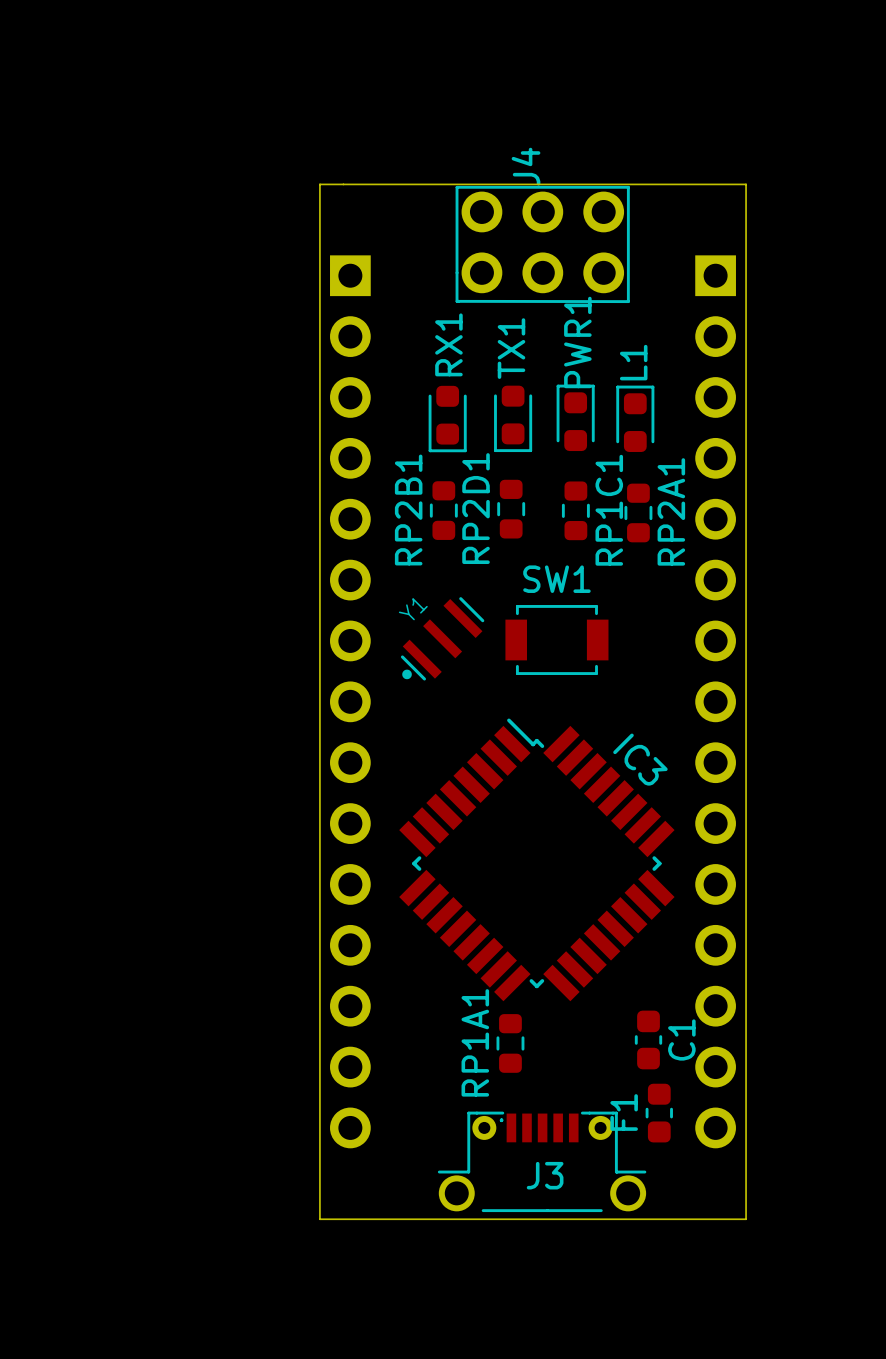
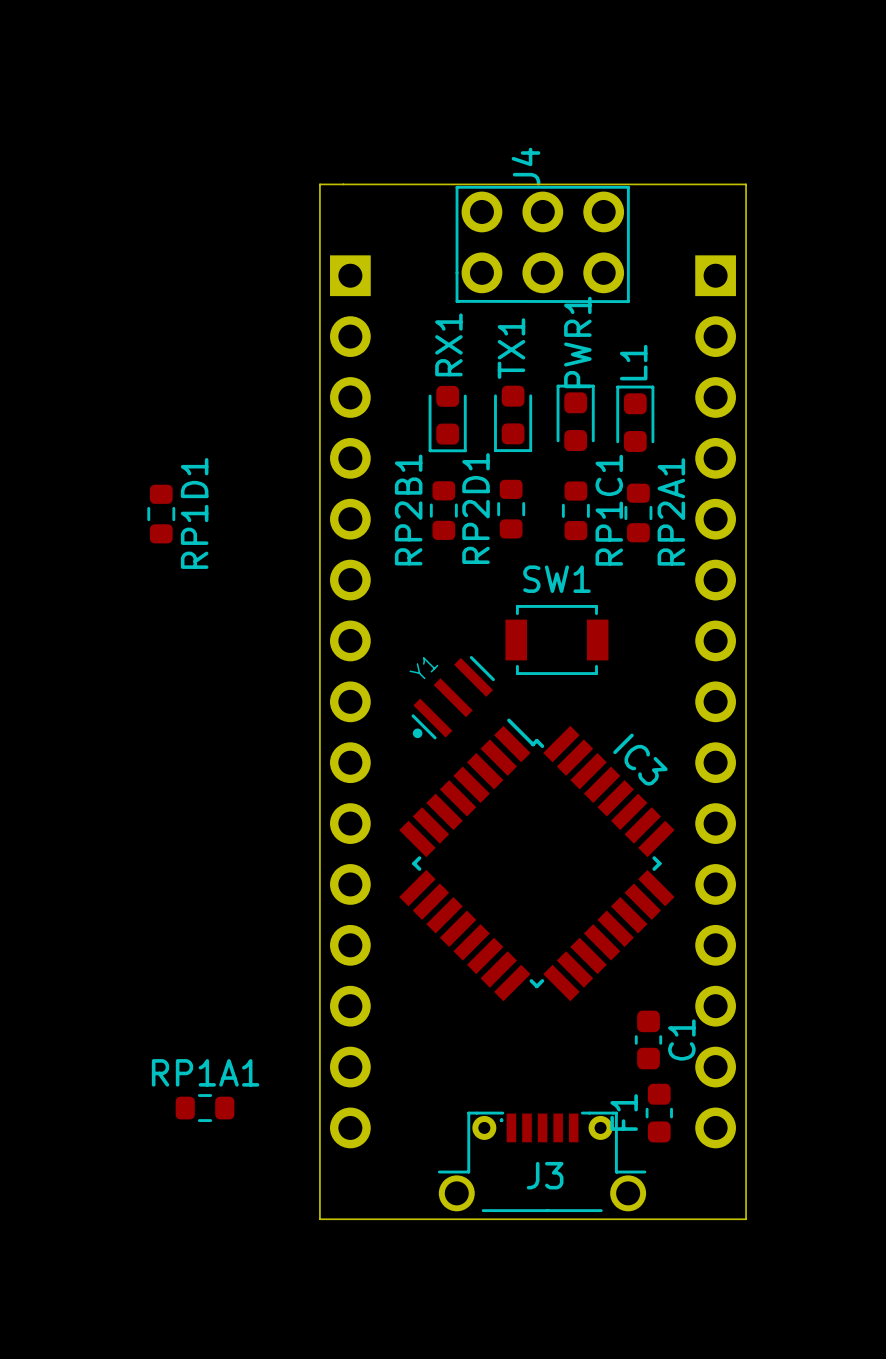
RP1D1: none -> (161, 514)
Y1 position: (442, 638) -> (453, 697)
RP1A1 rotation: 0° (510, 1043) -> 90° clockwise (205, 1108)
RP1A1 position: (510, 1043) -> (205, 1108)

